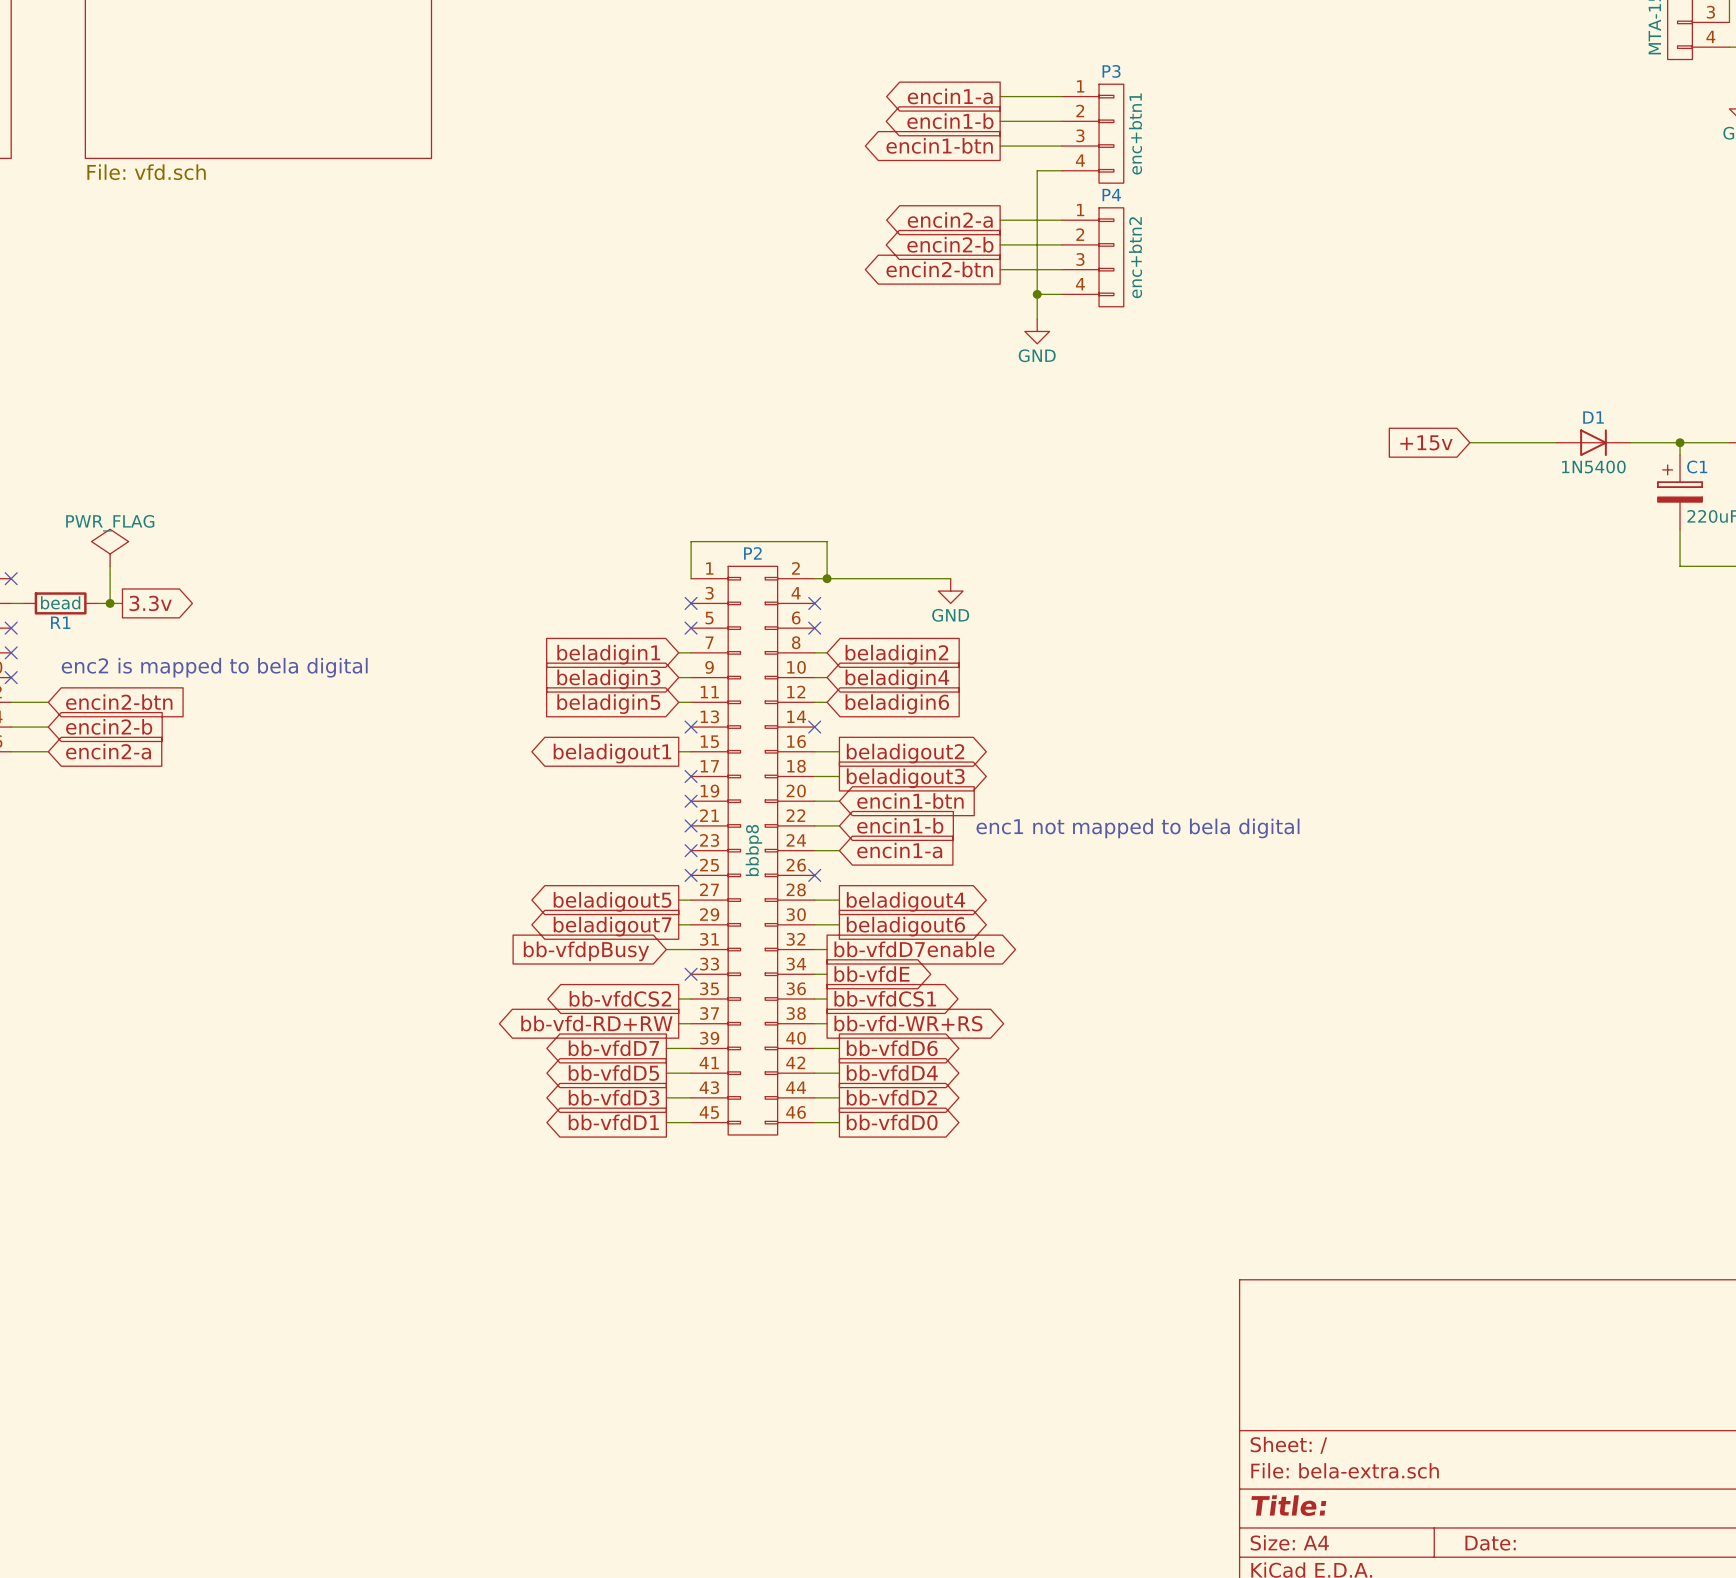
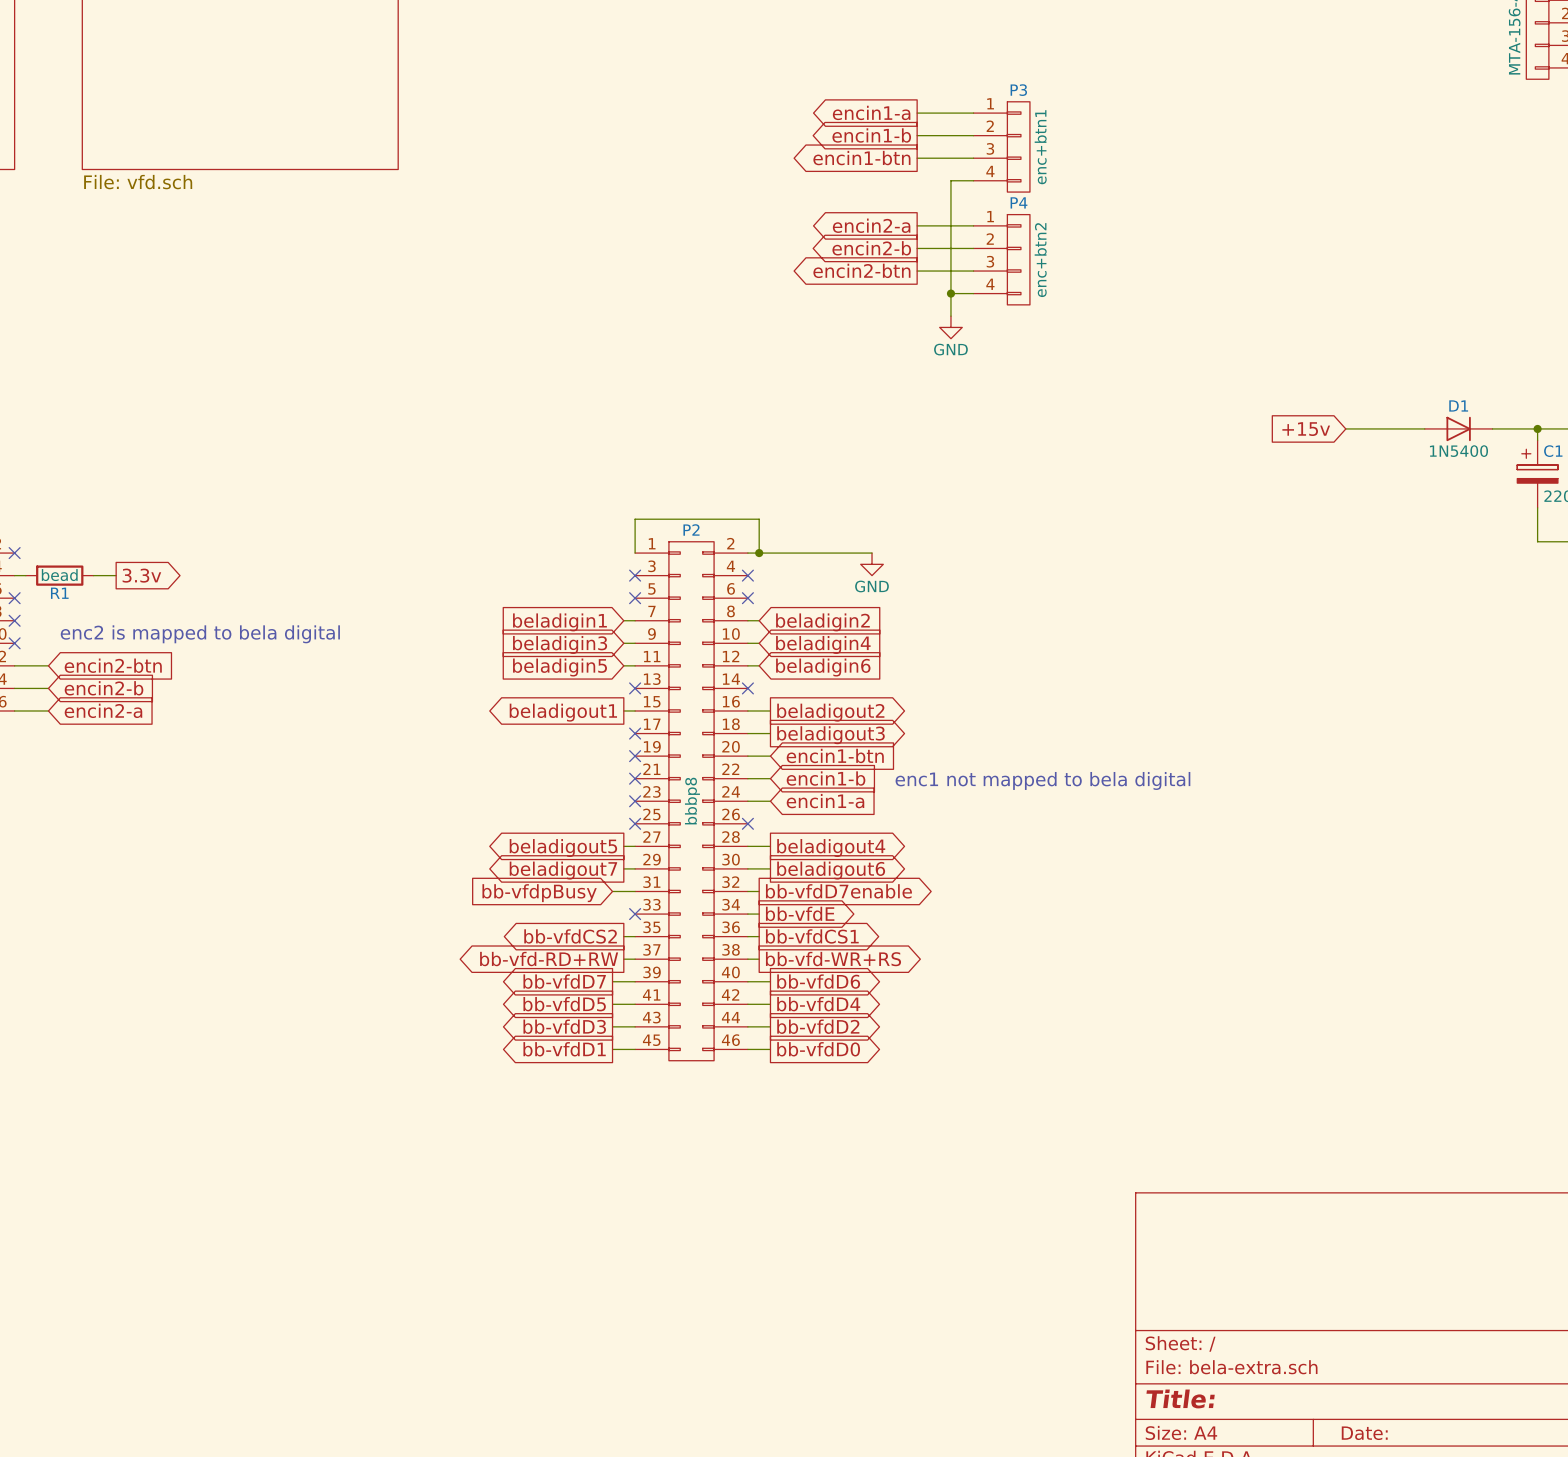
power symbol: PWR_FLAG (110, 547) -> none
wire: (110, 566) (110, 603) -> none
junction: (110, 603) -> none

